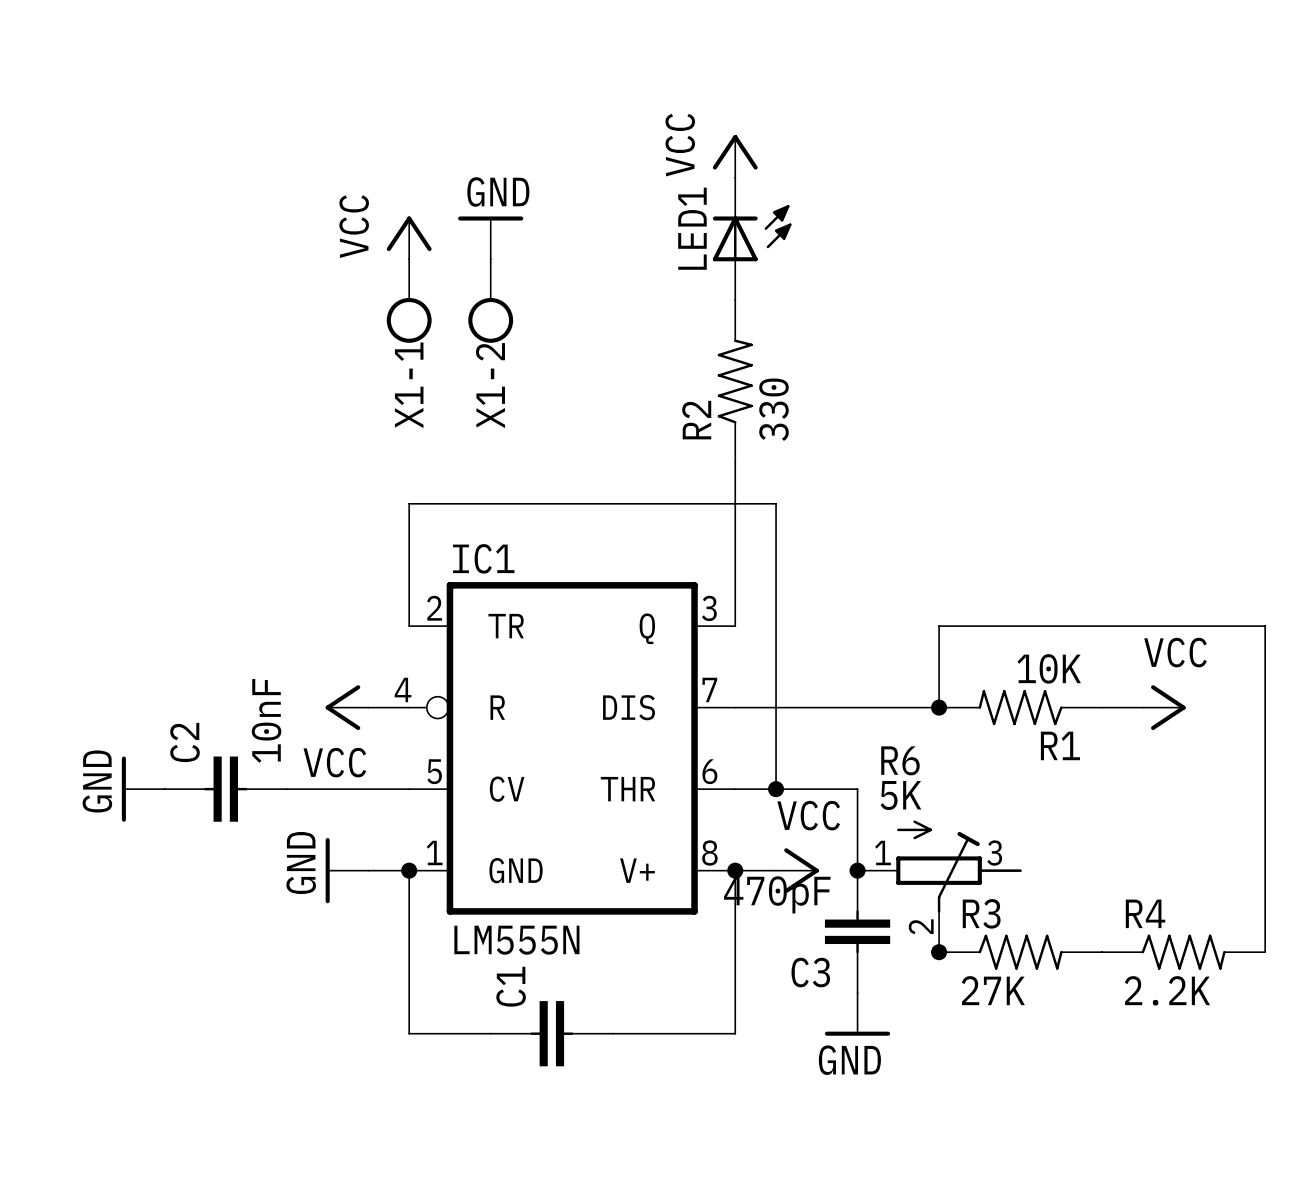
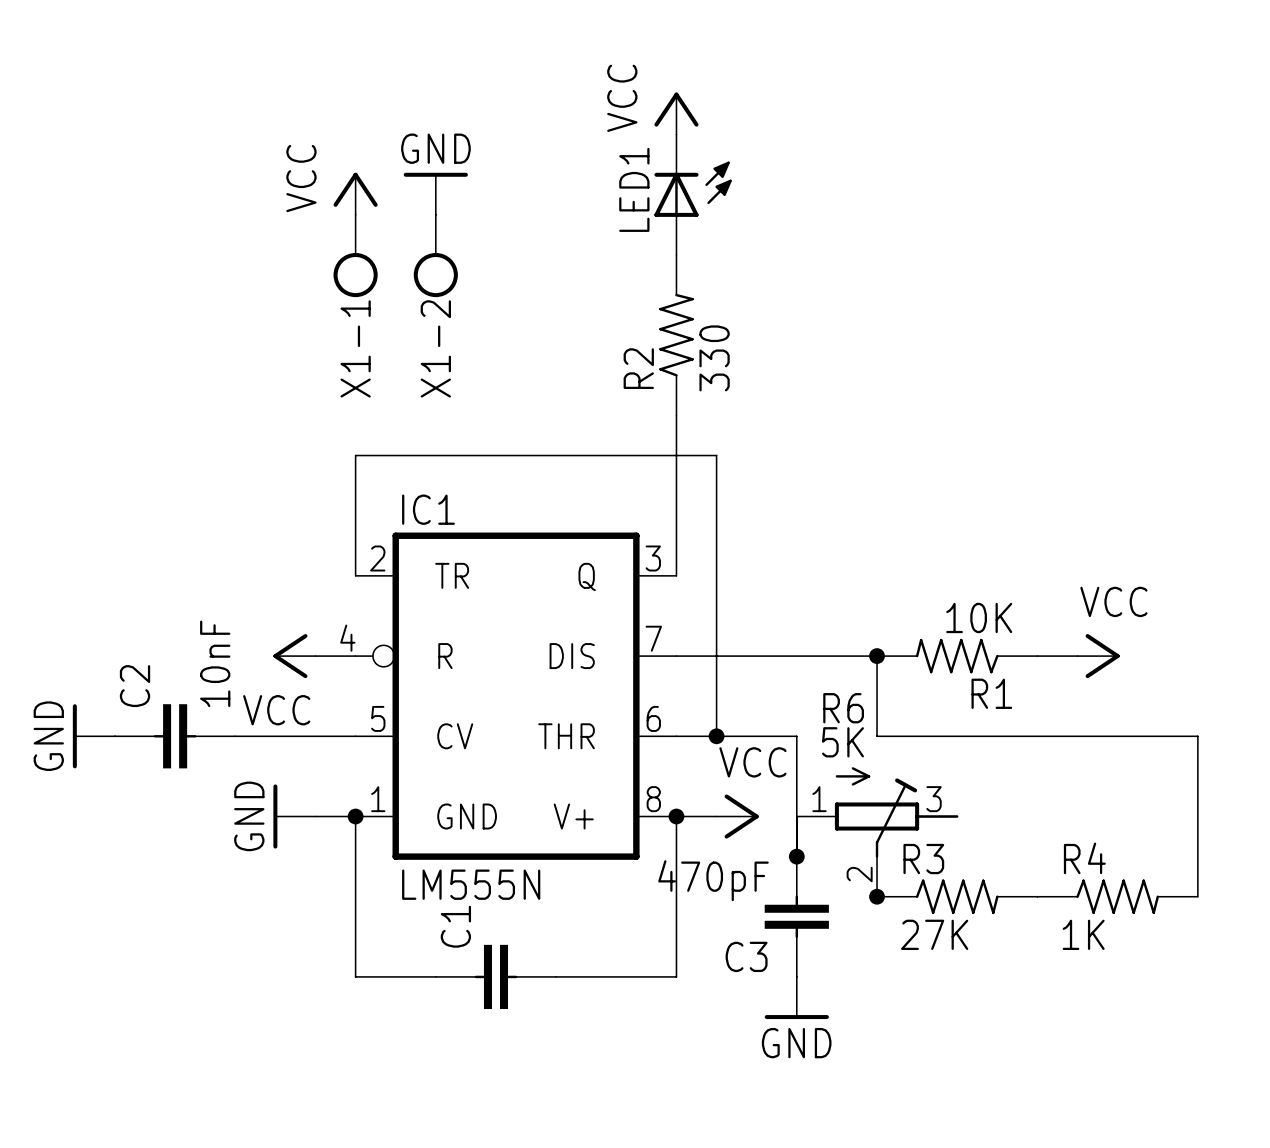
wire: (939, 707) (939, 626) (1265, 626) (1265, 789) -> (877, 656) (877, 736) (1197, 736)
junction position: (857, 870) -> (796, 856)
C3 position: (857, 931) -> (796, 916)
R4 value: 2.2K (1167, 990) -> 1K (1083, 934)
power symbol position: GND (857, 1014) -> GND (796, 998)

